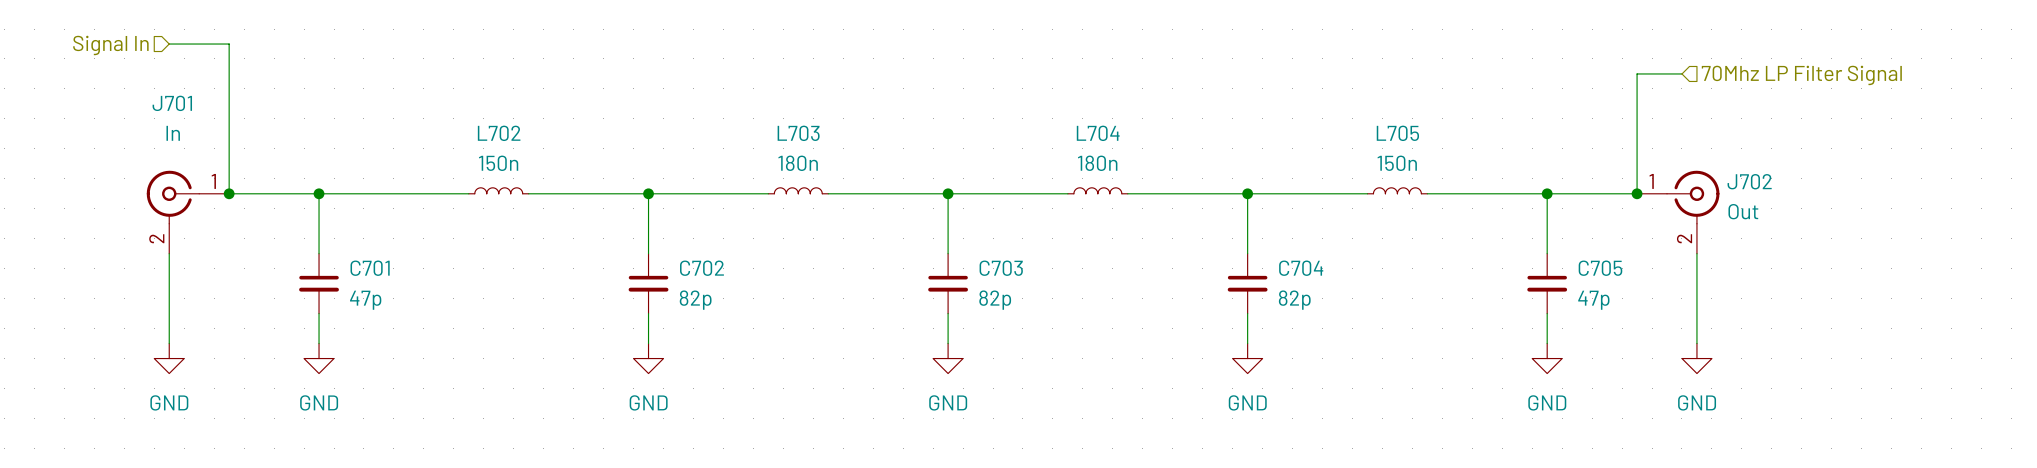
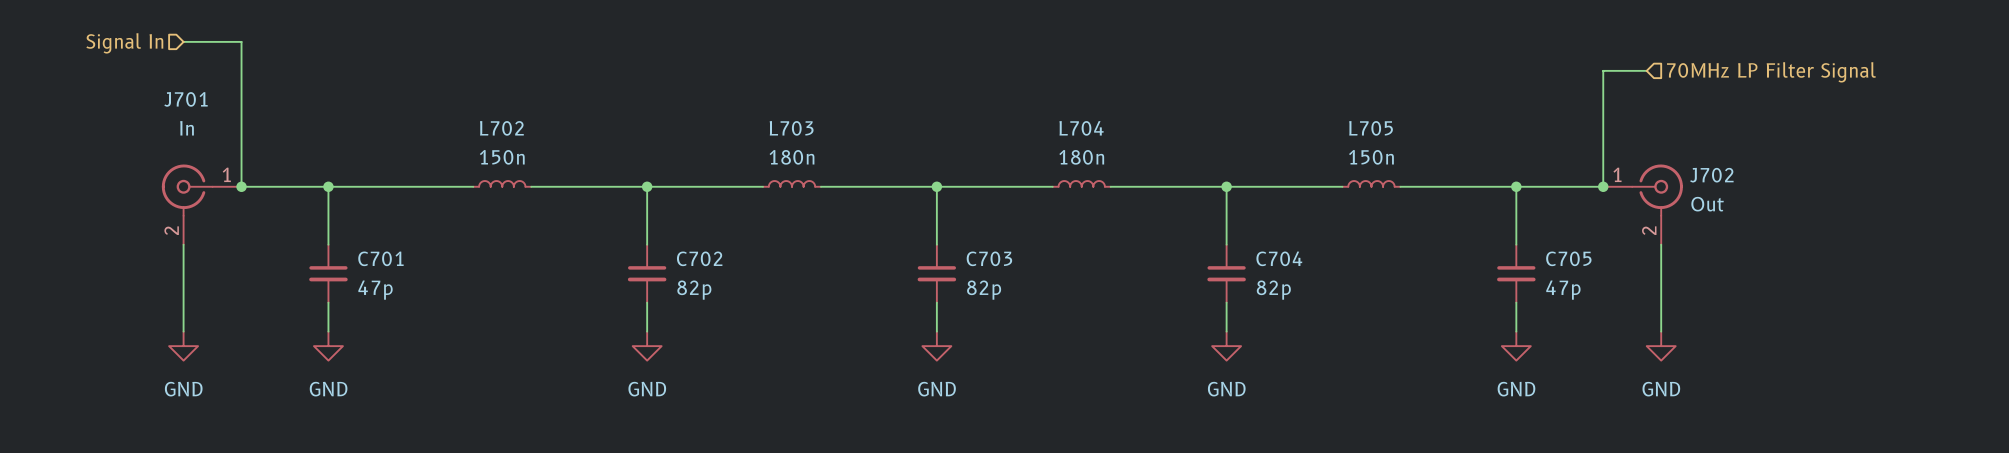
hierarchical label: 70Mhz LP Filter Signal (1801, 75) -> 70MHz LP Filter Signal (1771, 72)

